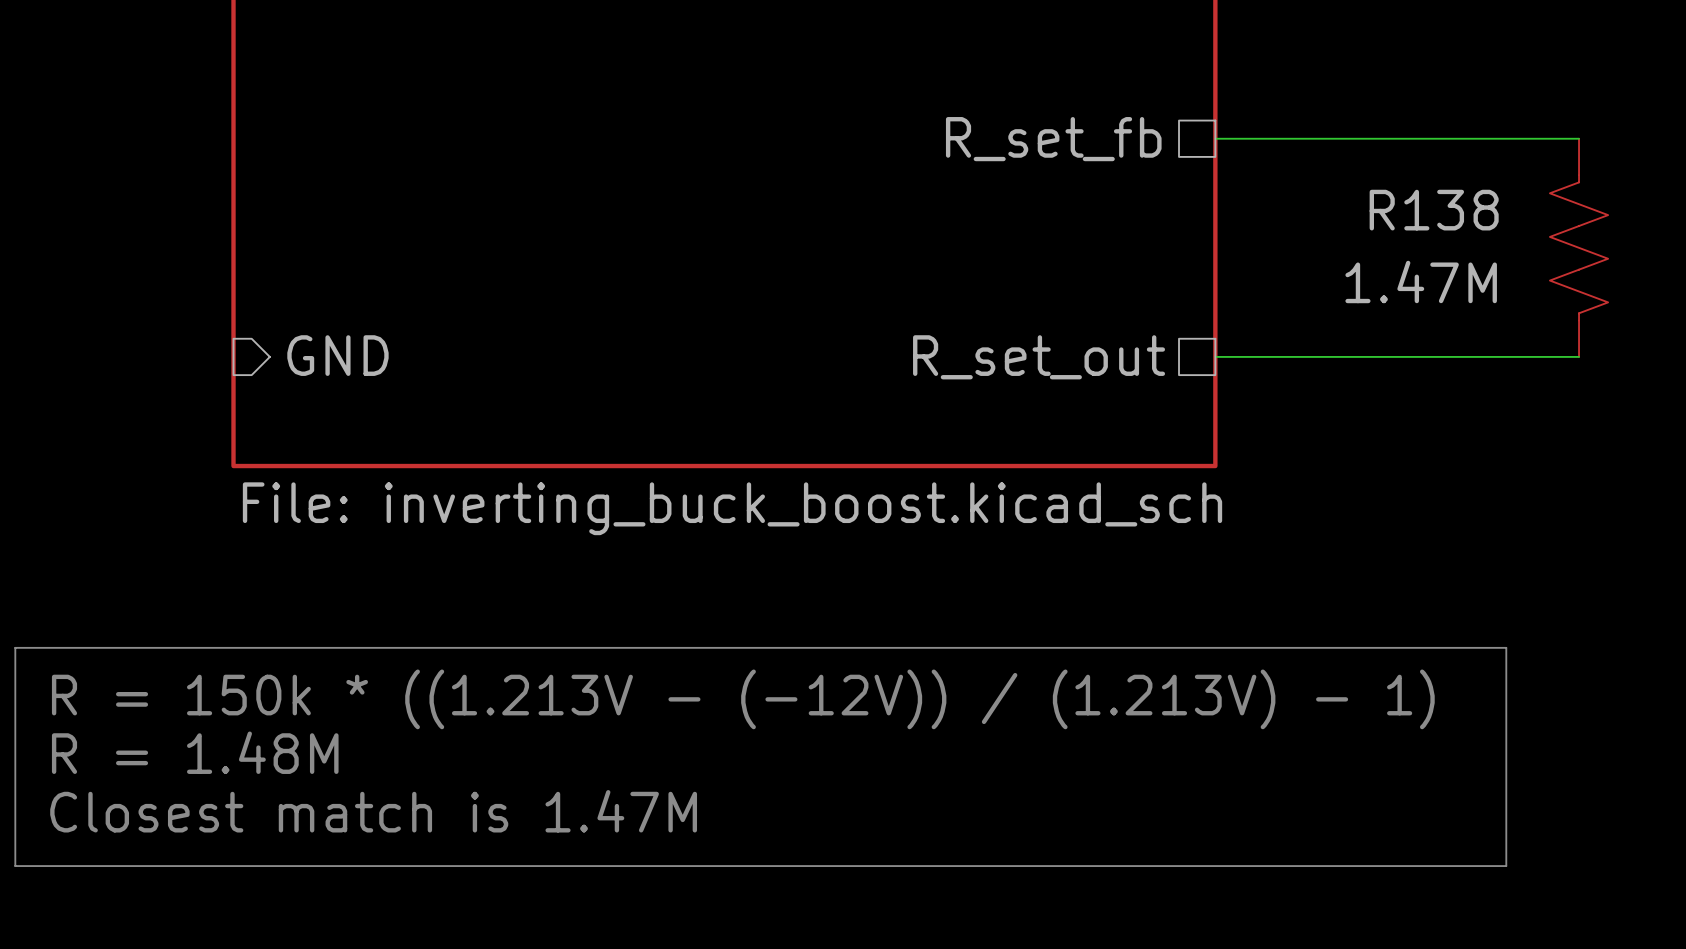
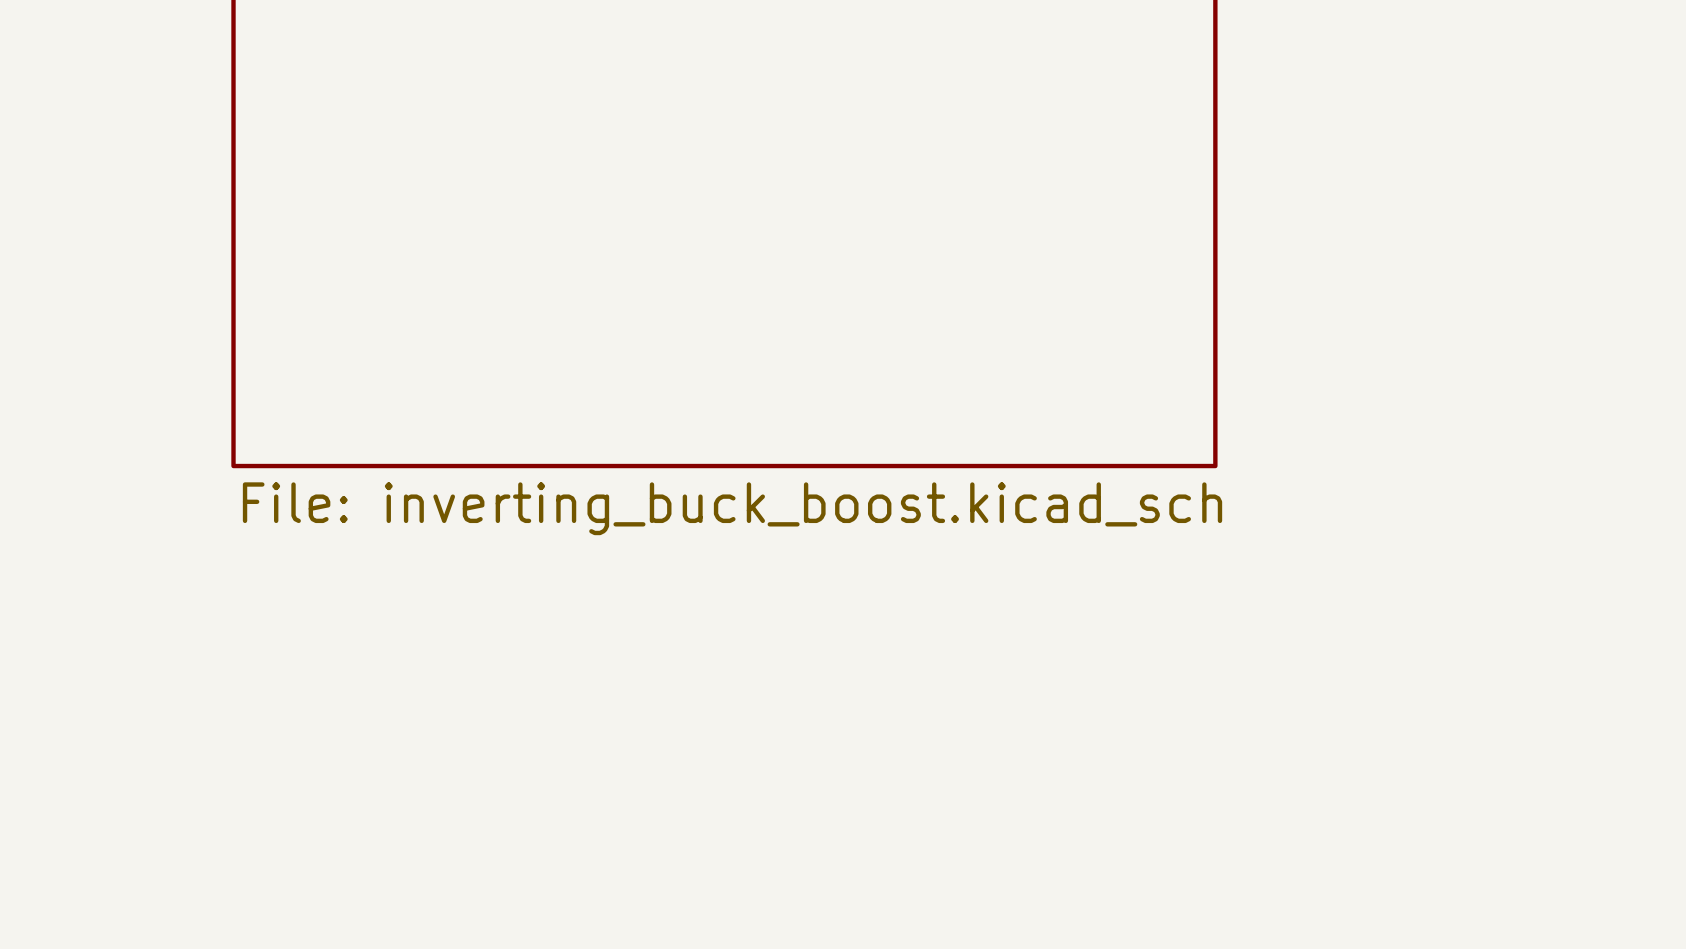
wire: (1215, 138) (1579, 138) -> none
sheet pin: R_set_fb (1053, 139) -> none
R138: 1.47M (1579, 247) -> none
sheet pin: GND (337, 355) -> none
wire: (1215, 356) (1579, 356) -> none
sheet pin: R_set_out (1039, 357) -> none
line: (15, 647) (1506, 647) (1506, 866) (15, 866) (15, 647) -> none
text: R = 150k * ((1.213V - (-12V)) / (1.213V) - 1) (743, 699) -> none
text: R = 1.48M (195, 752) -> none
text: Closest match is 1.47M (373, 811) -> none

